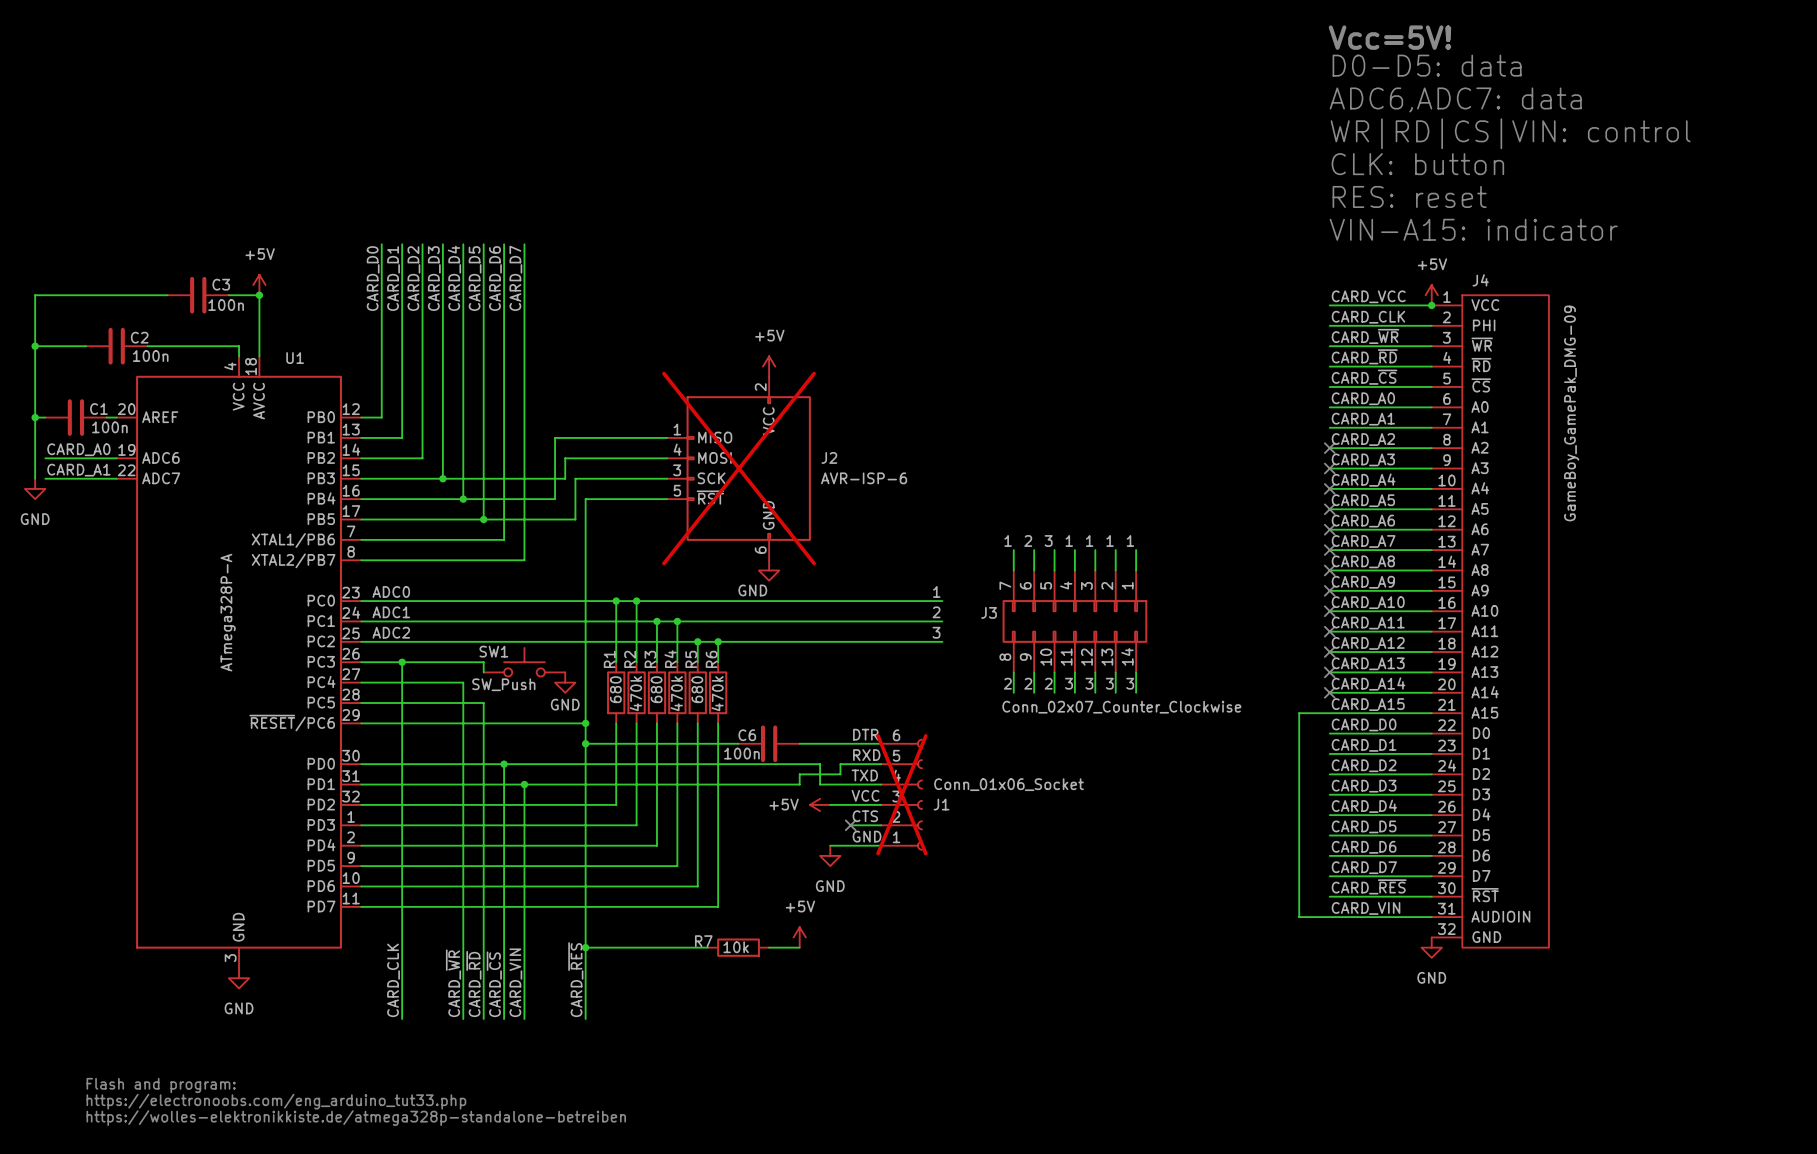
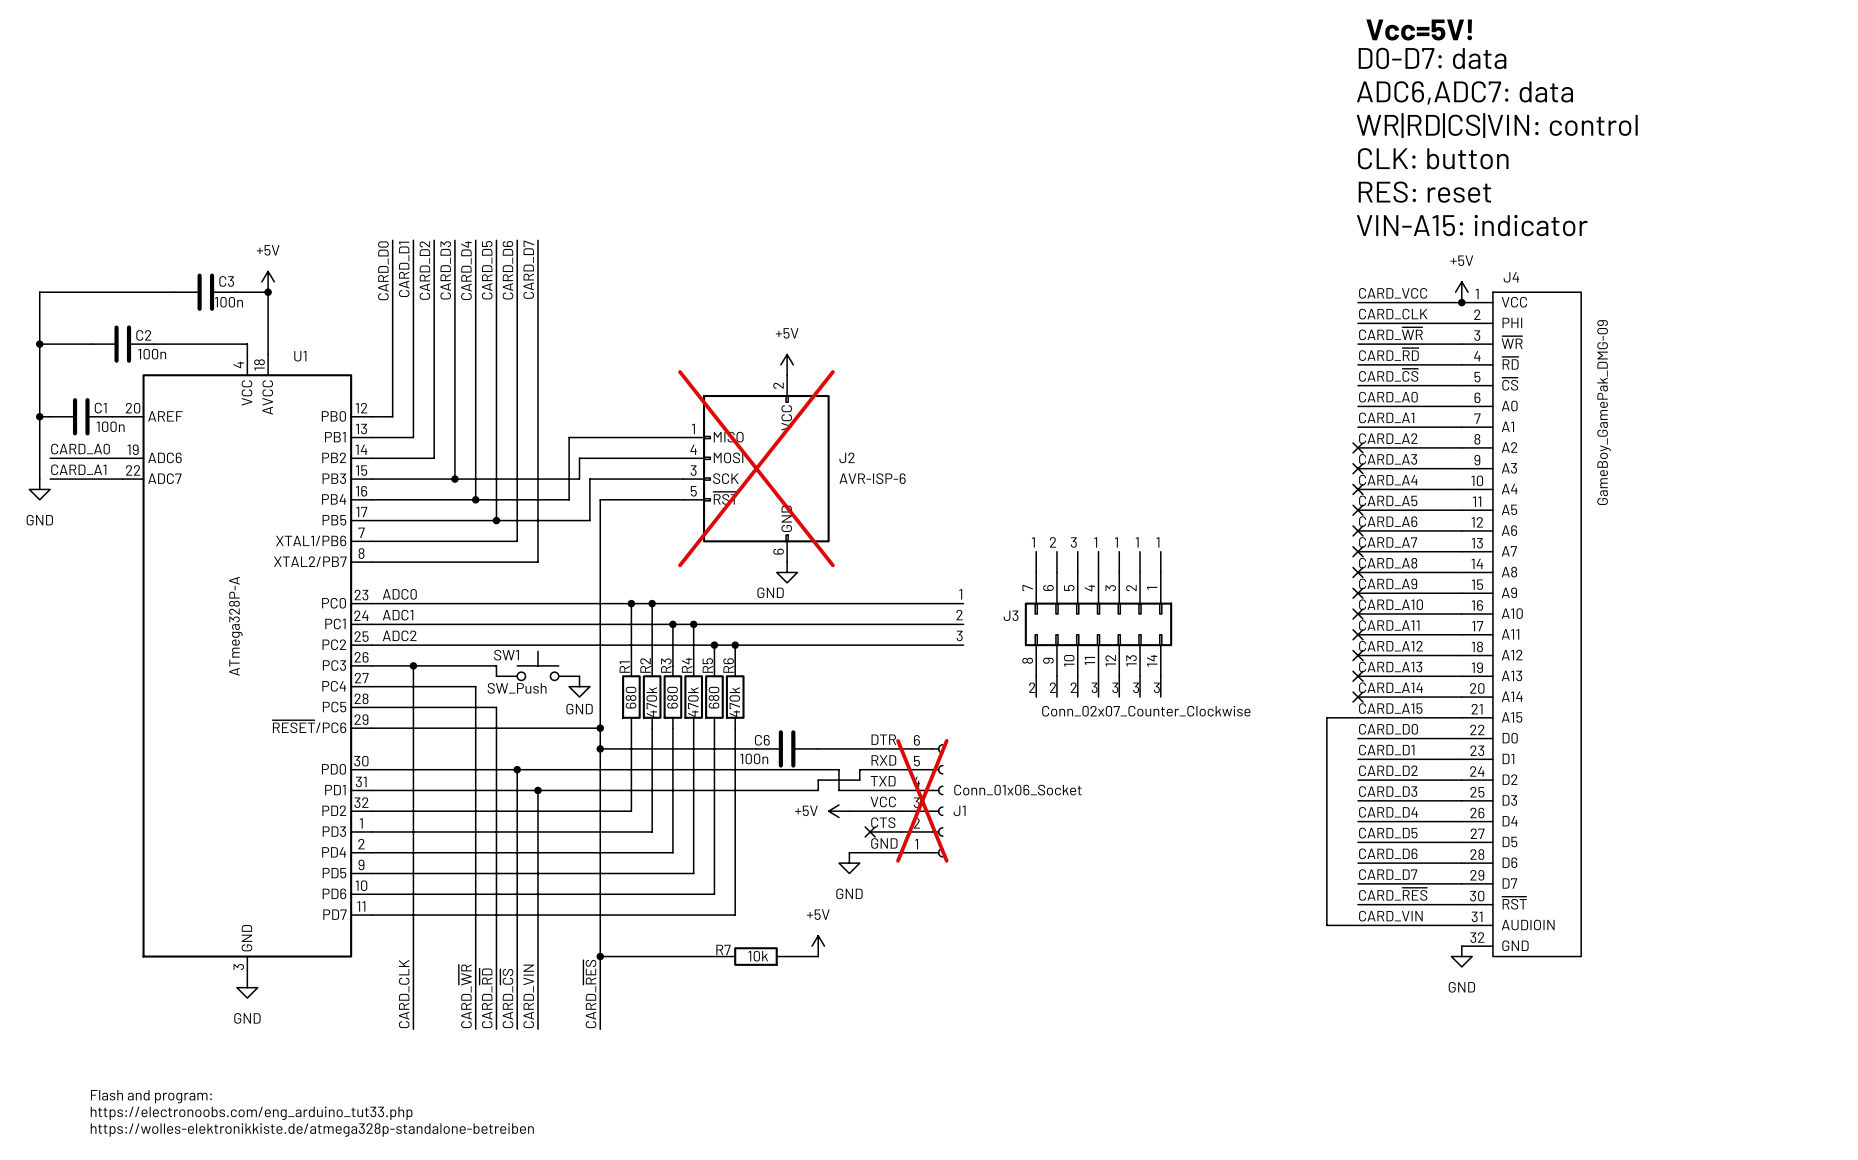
text: D0-D5: data (1427, 65) -> D0-D7: data (1432, 58)

